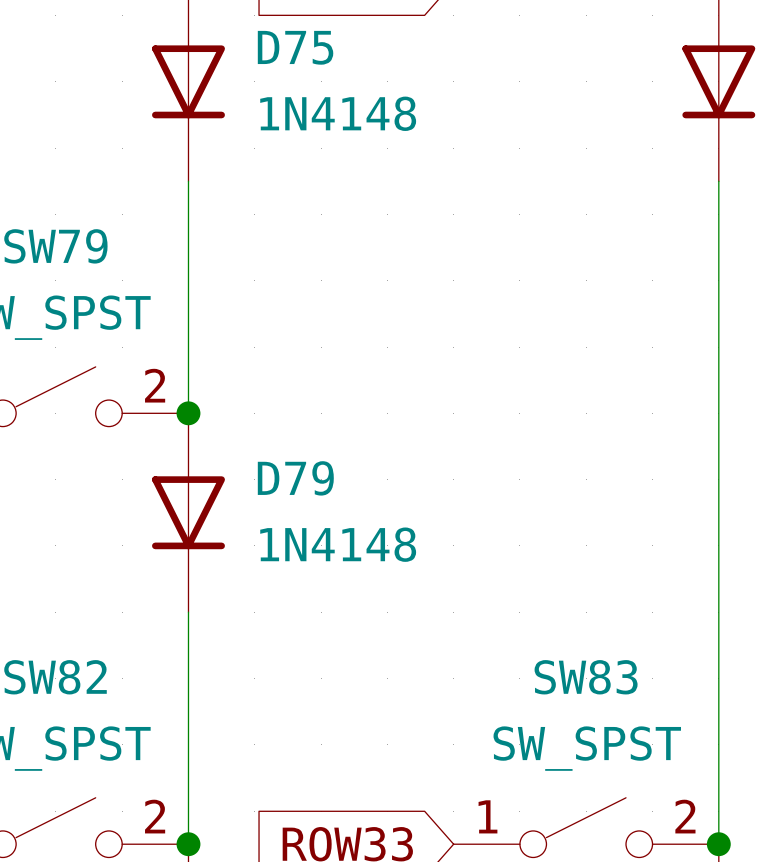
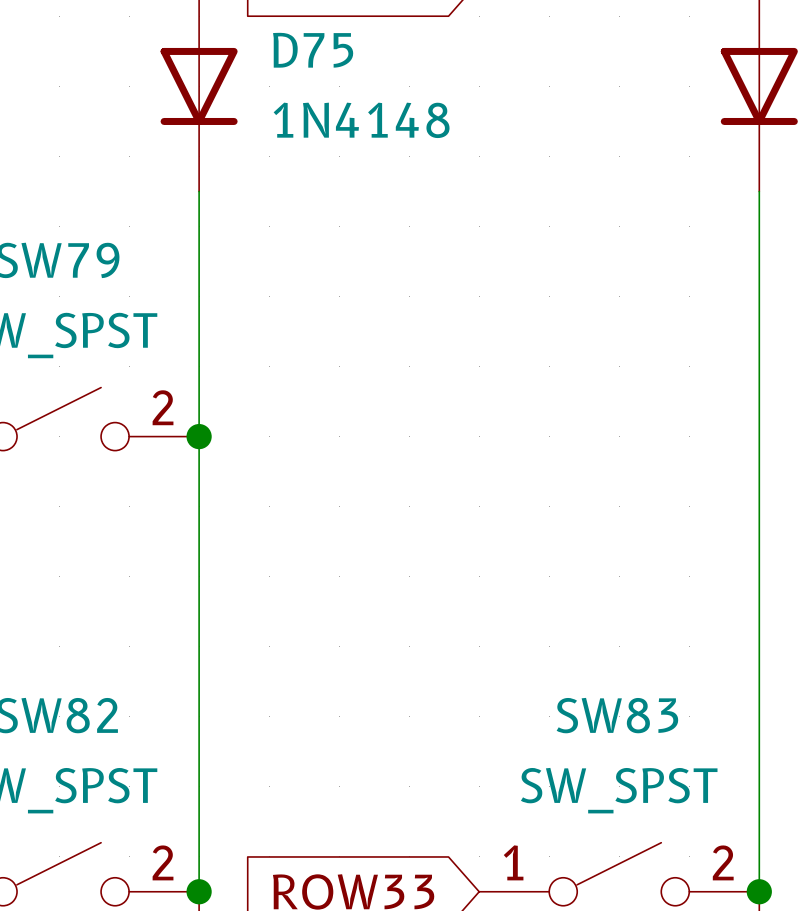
D79: 1N4148 (188, 512) -> none

